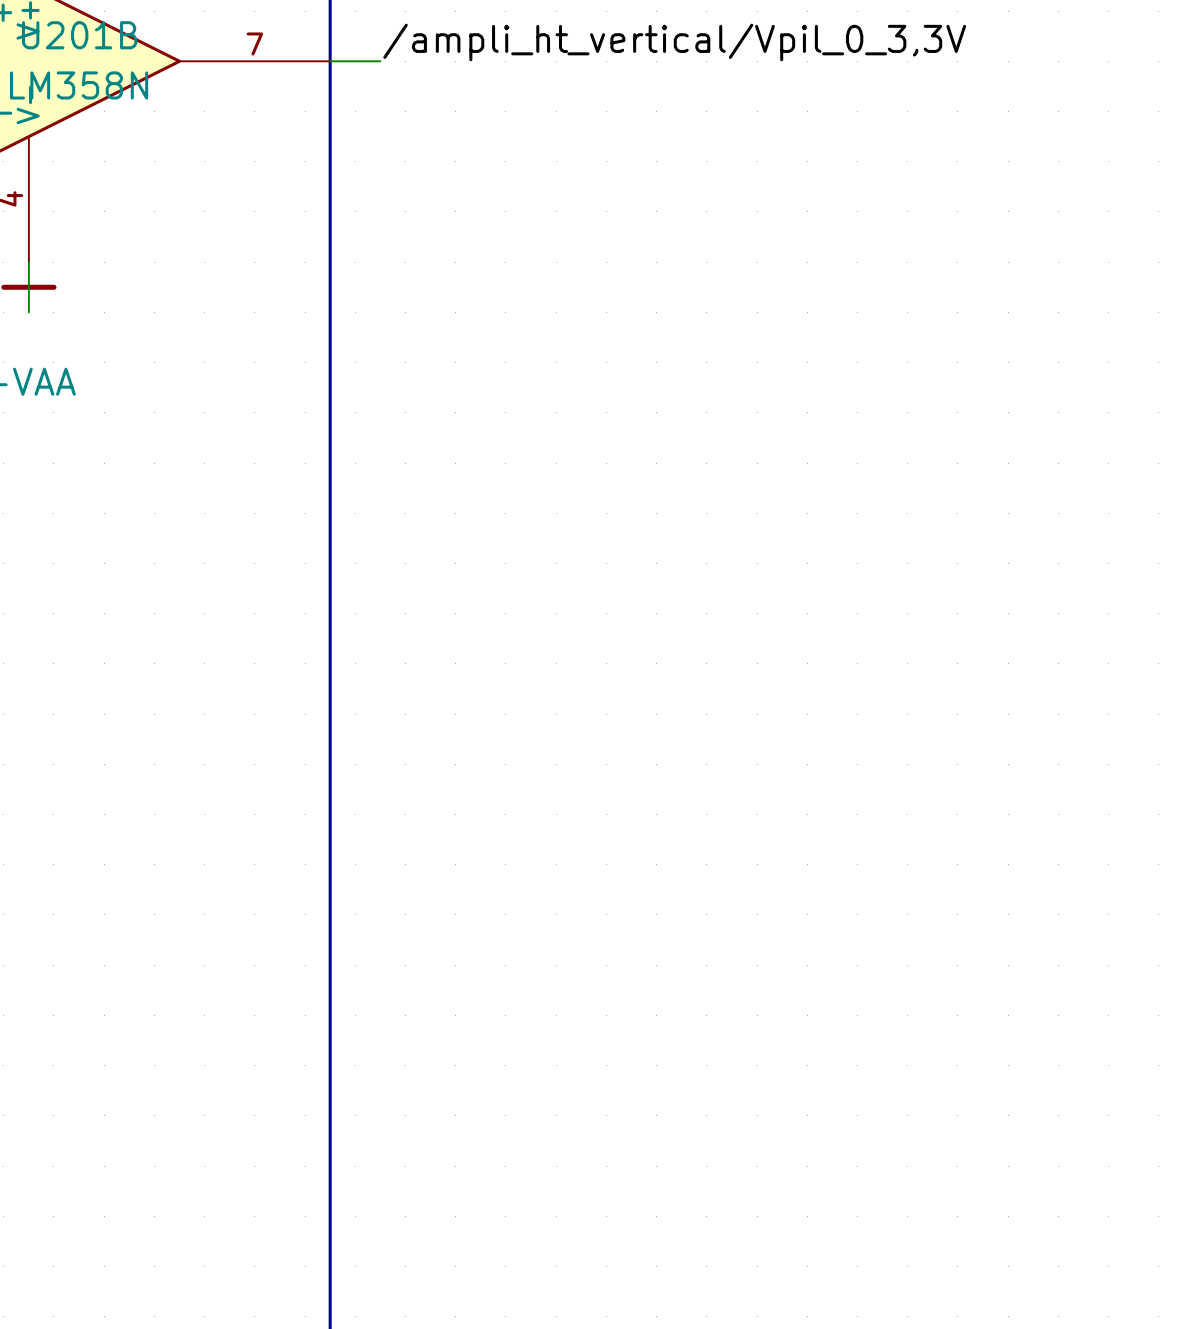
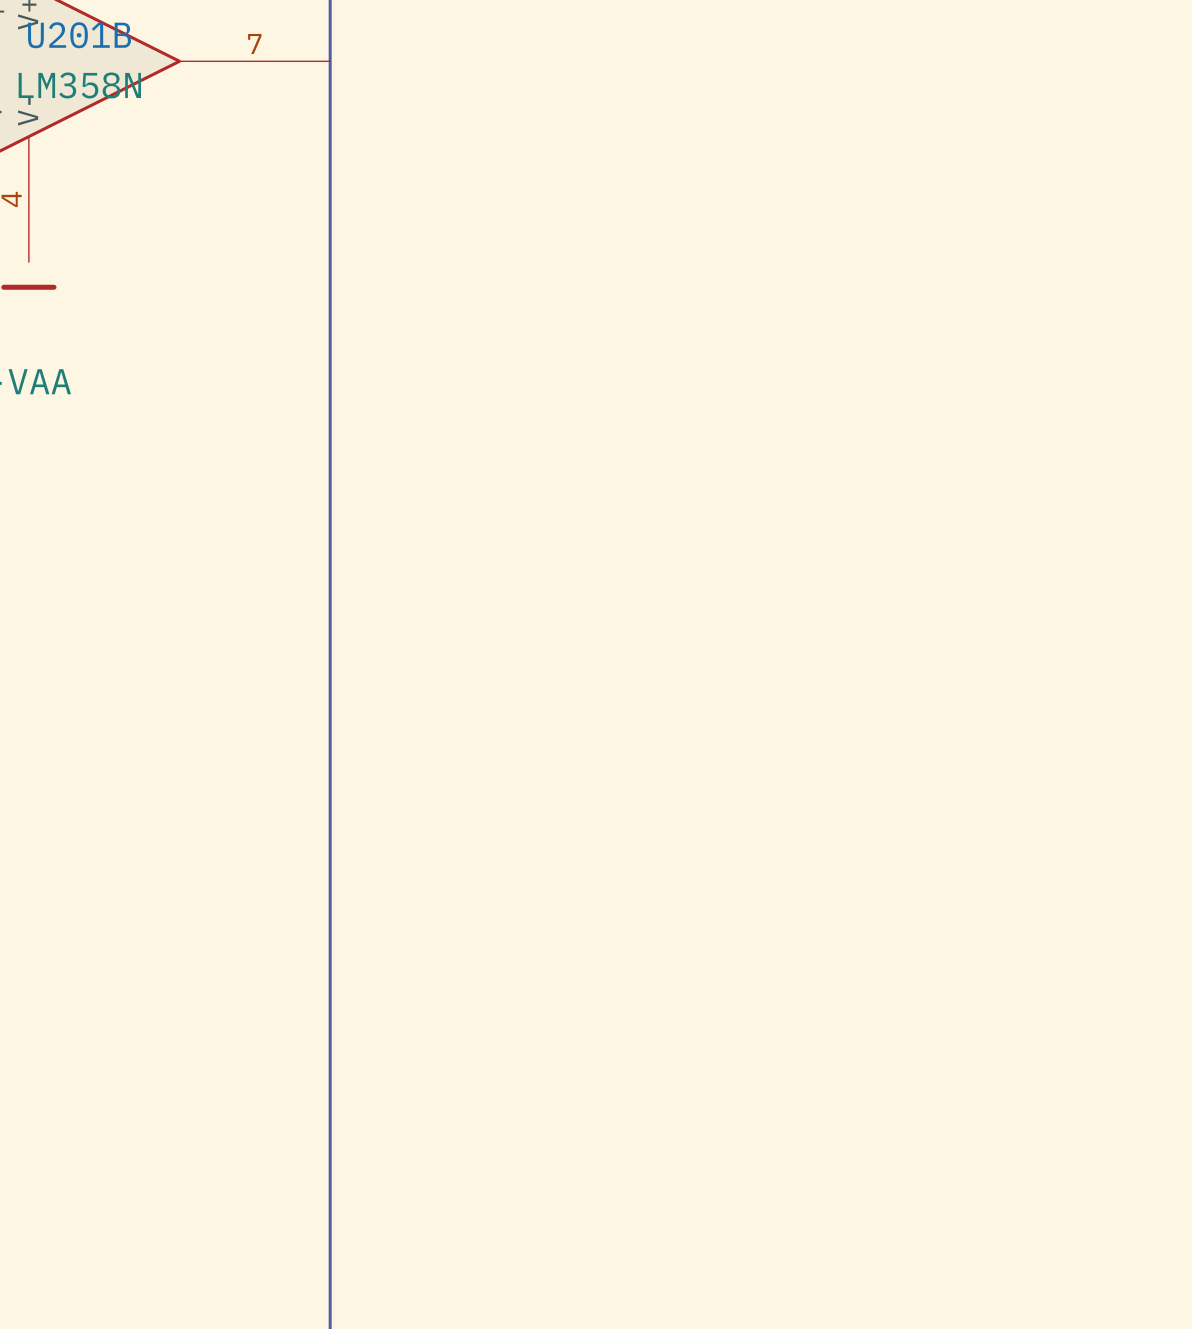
label: /ampli_ht_vertical/Vpil_0_3,3V (674, 42) -> none
wire: (330, 61) (380, 61) -> none
wire: (28, 262) (28, 312) -> none

